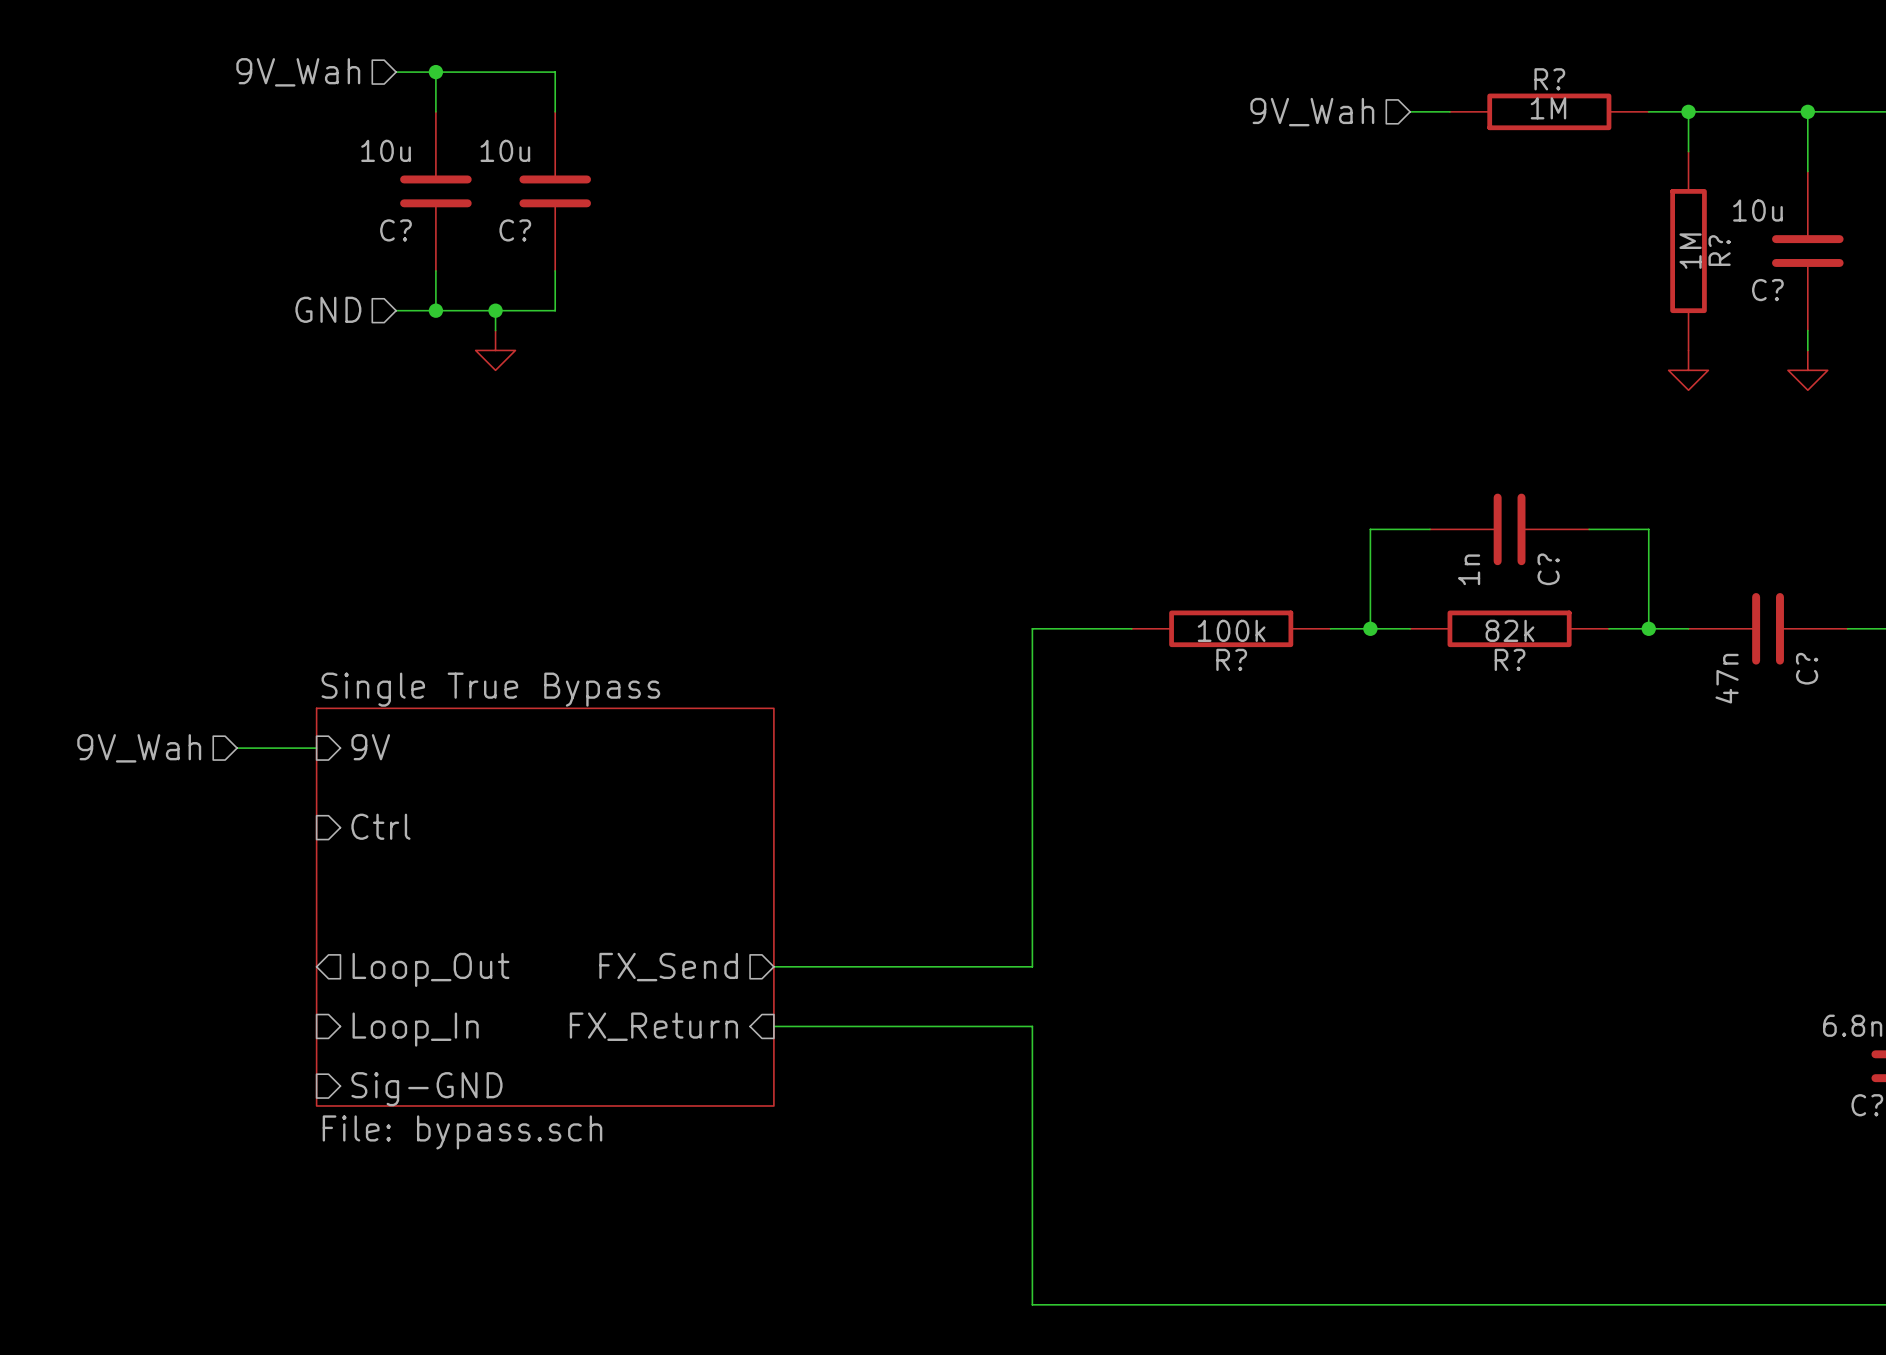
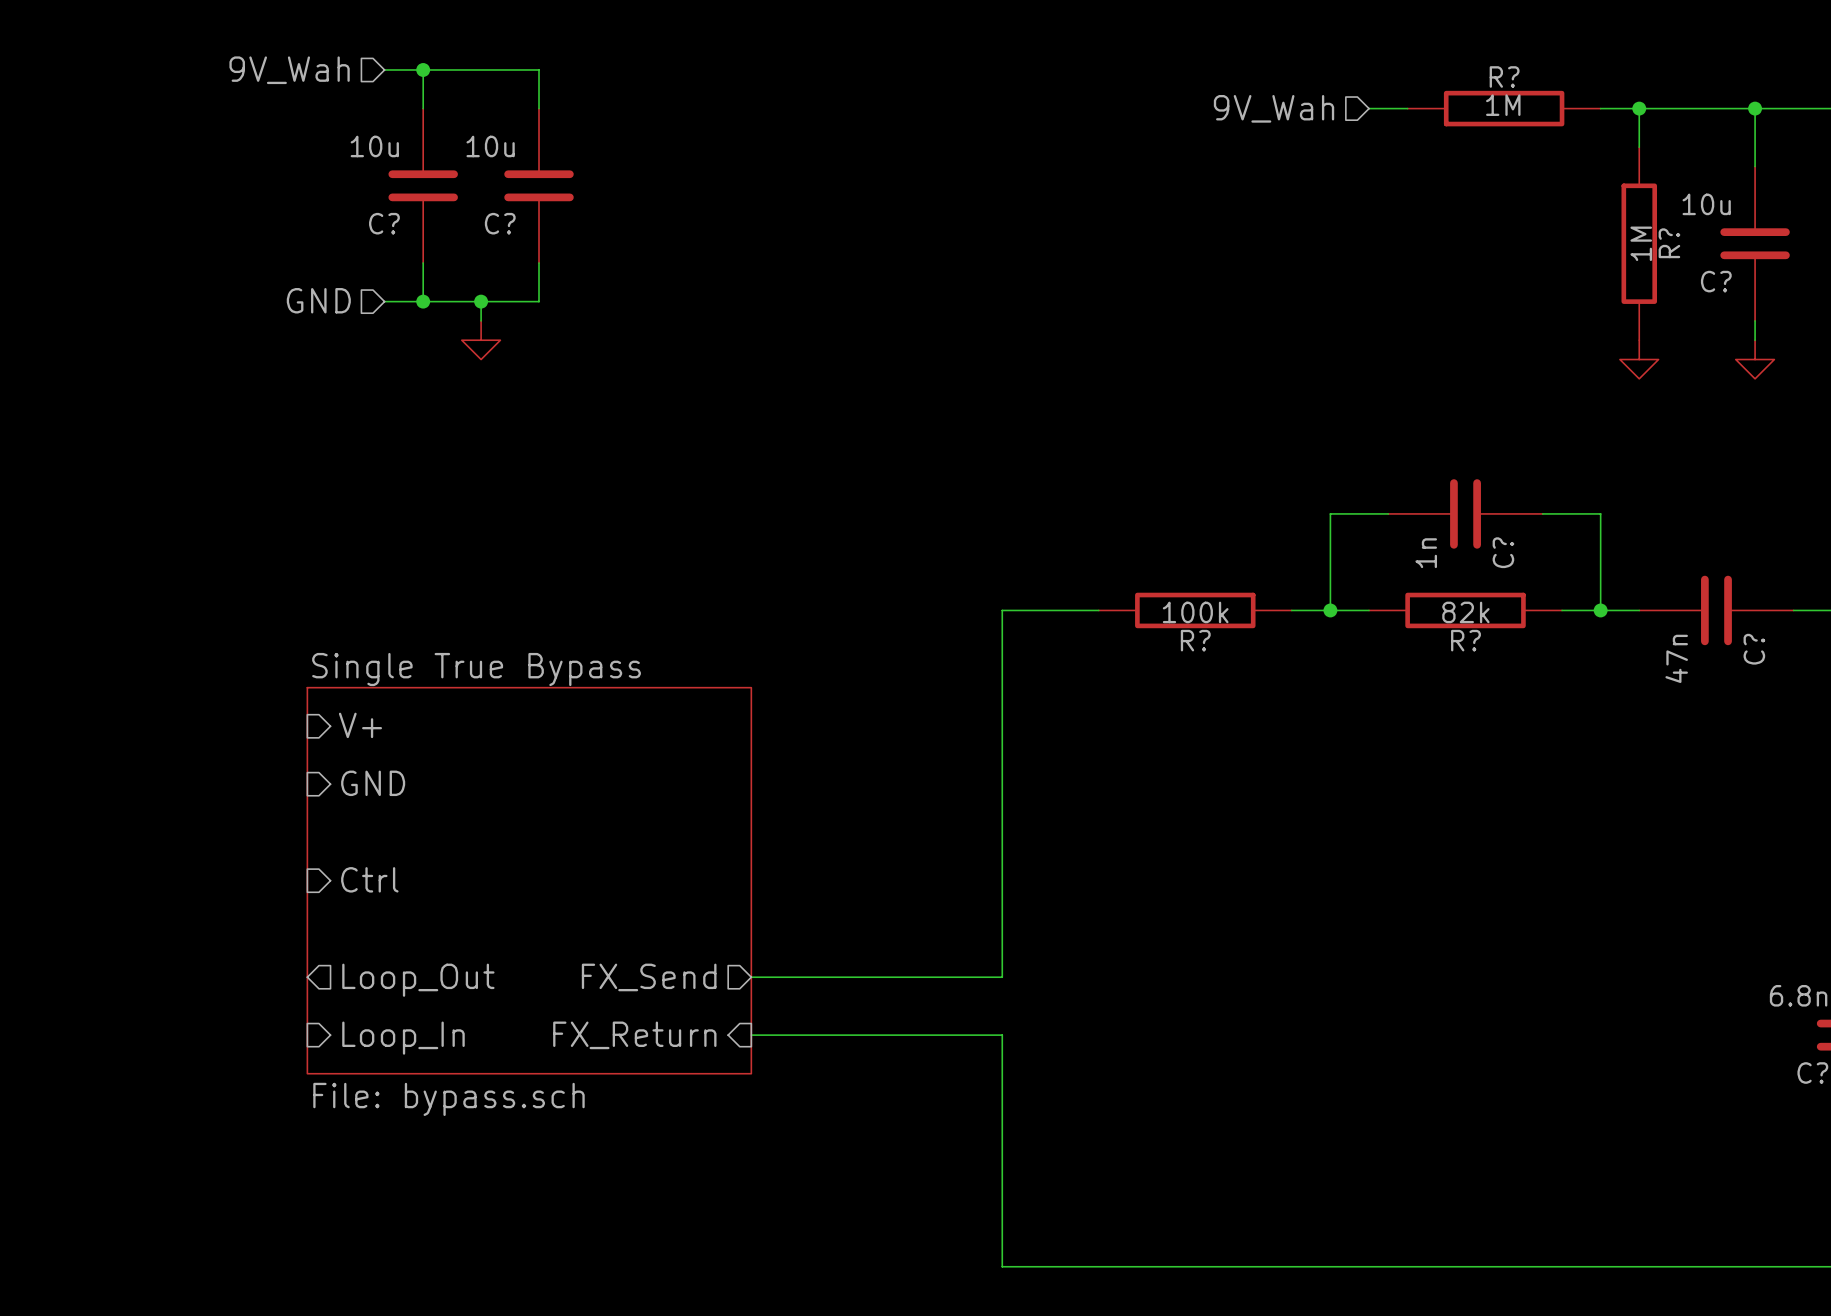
sheet pin: 9V (370, 747) -> V+ (360, 725)
hierarchical label: 9V_Wah (139, 748) -> none
wire: (237, 748) (316, 748) -> none
sheet pin: none -> GND (373, 783)
sheet pin position: Ctrl (380, 826) -> Ctrl (369, 879)
wire: (773, 966) (1032, 966) -> (751, 977) (1002, 977) (1002, 938)
sheet pin position: FX_Send (668, 967) -> FX_Send (649, 977)
sheet pin position: Loop_Out (430, 969) -> Loop_Out (418, 980)
sheet pin position: FX_Return (653, 1026) -> FX_Return (634, 1035)
wire: (773, 1026) (1032, 1026) (1032, 1066) -> (751, 1035) (1002, 1035)
sheet pin position: Loop_In (415, 1029) -> Loop_In (403, 1038)
sheet pin: Sig-GND (426, 1089) -> none

